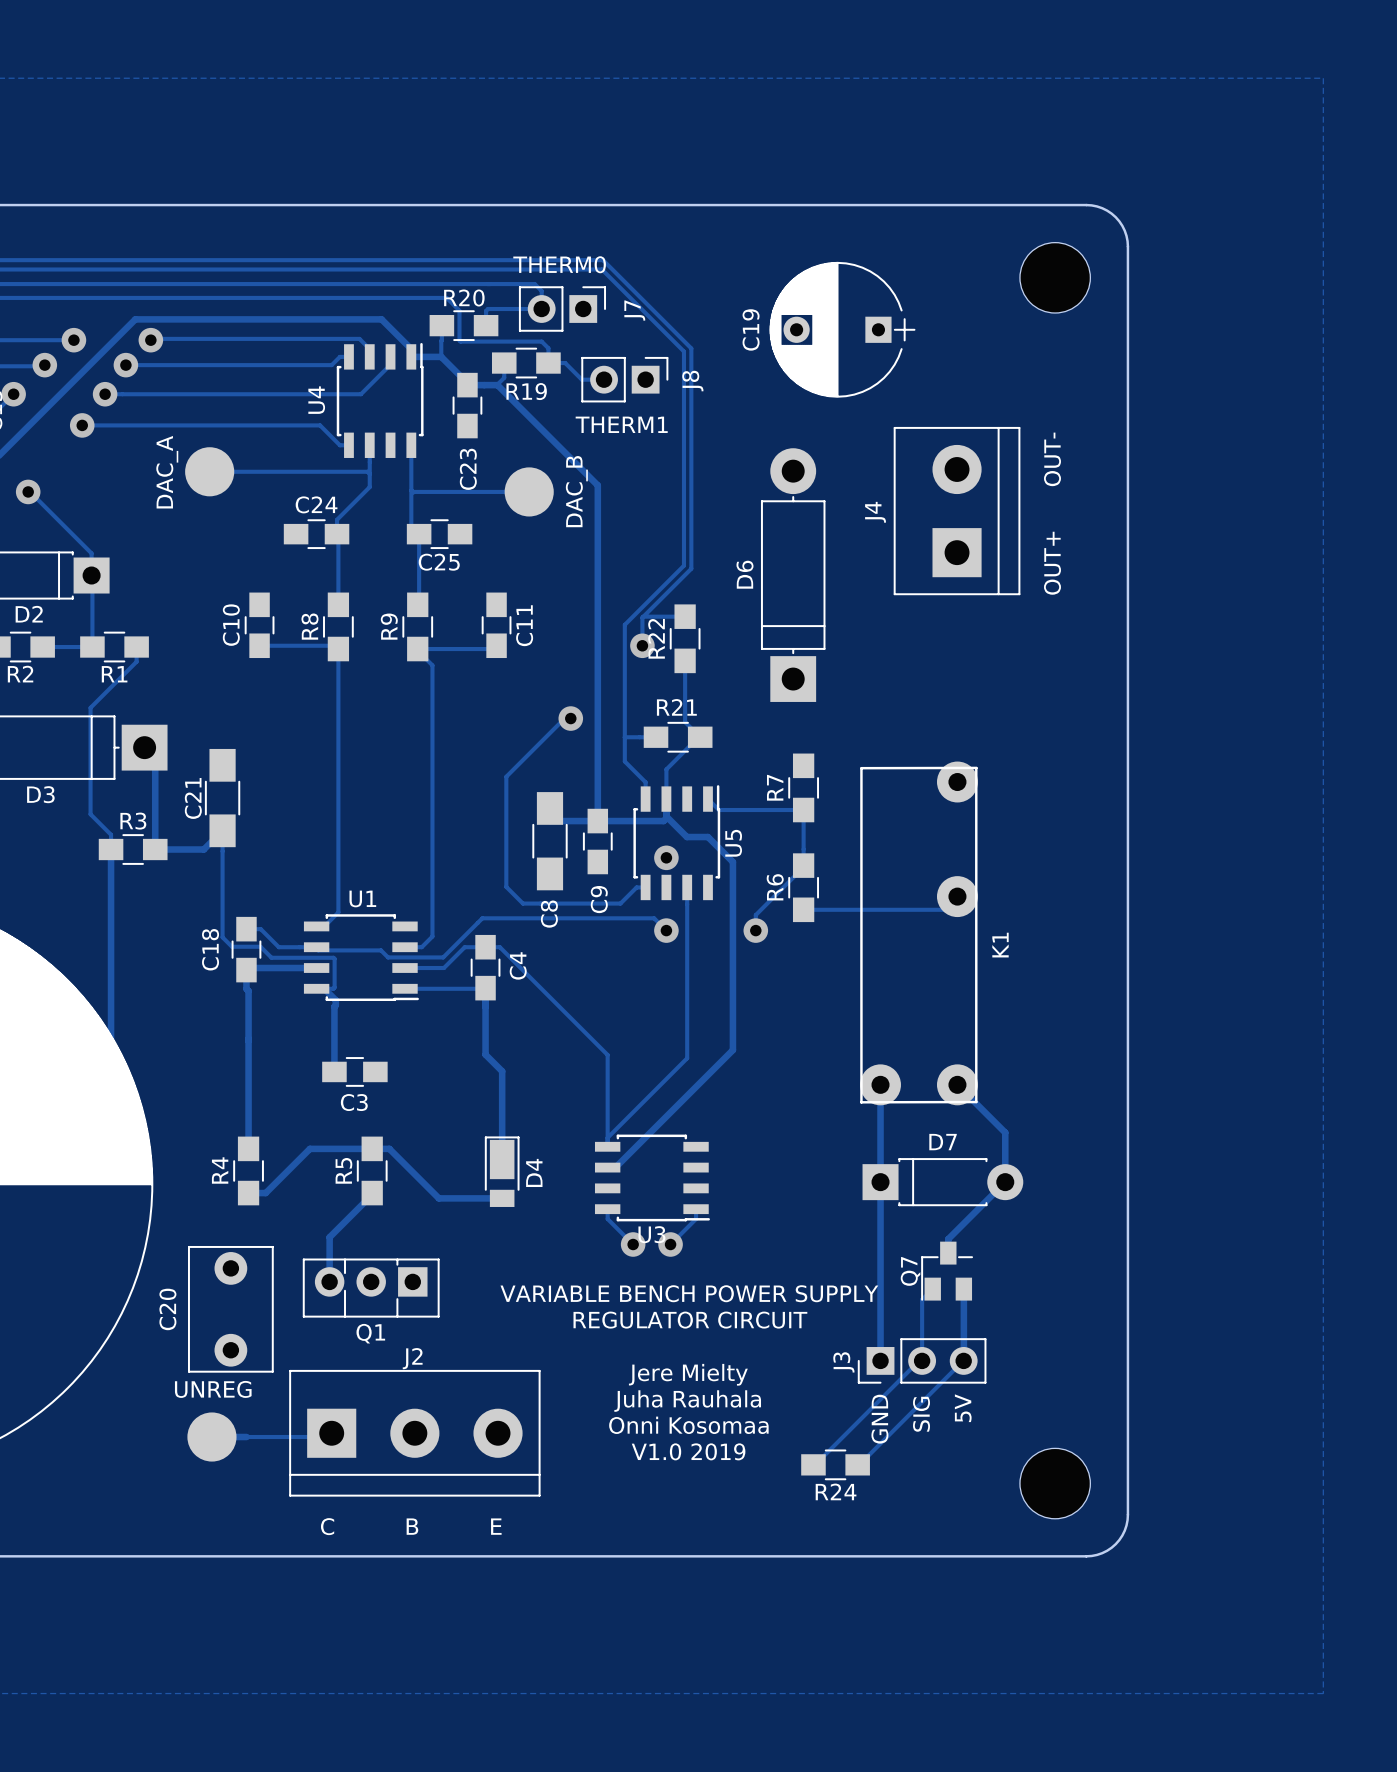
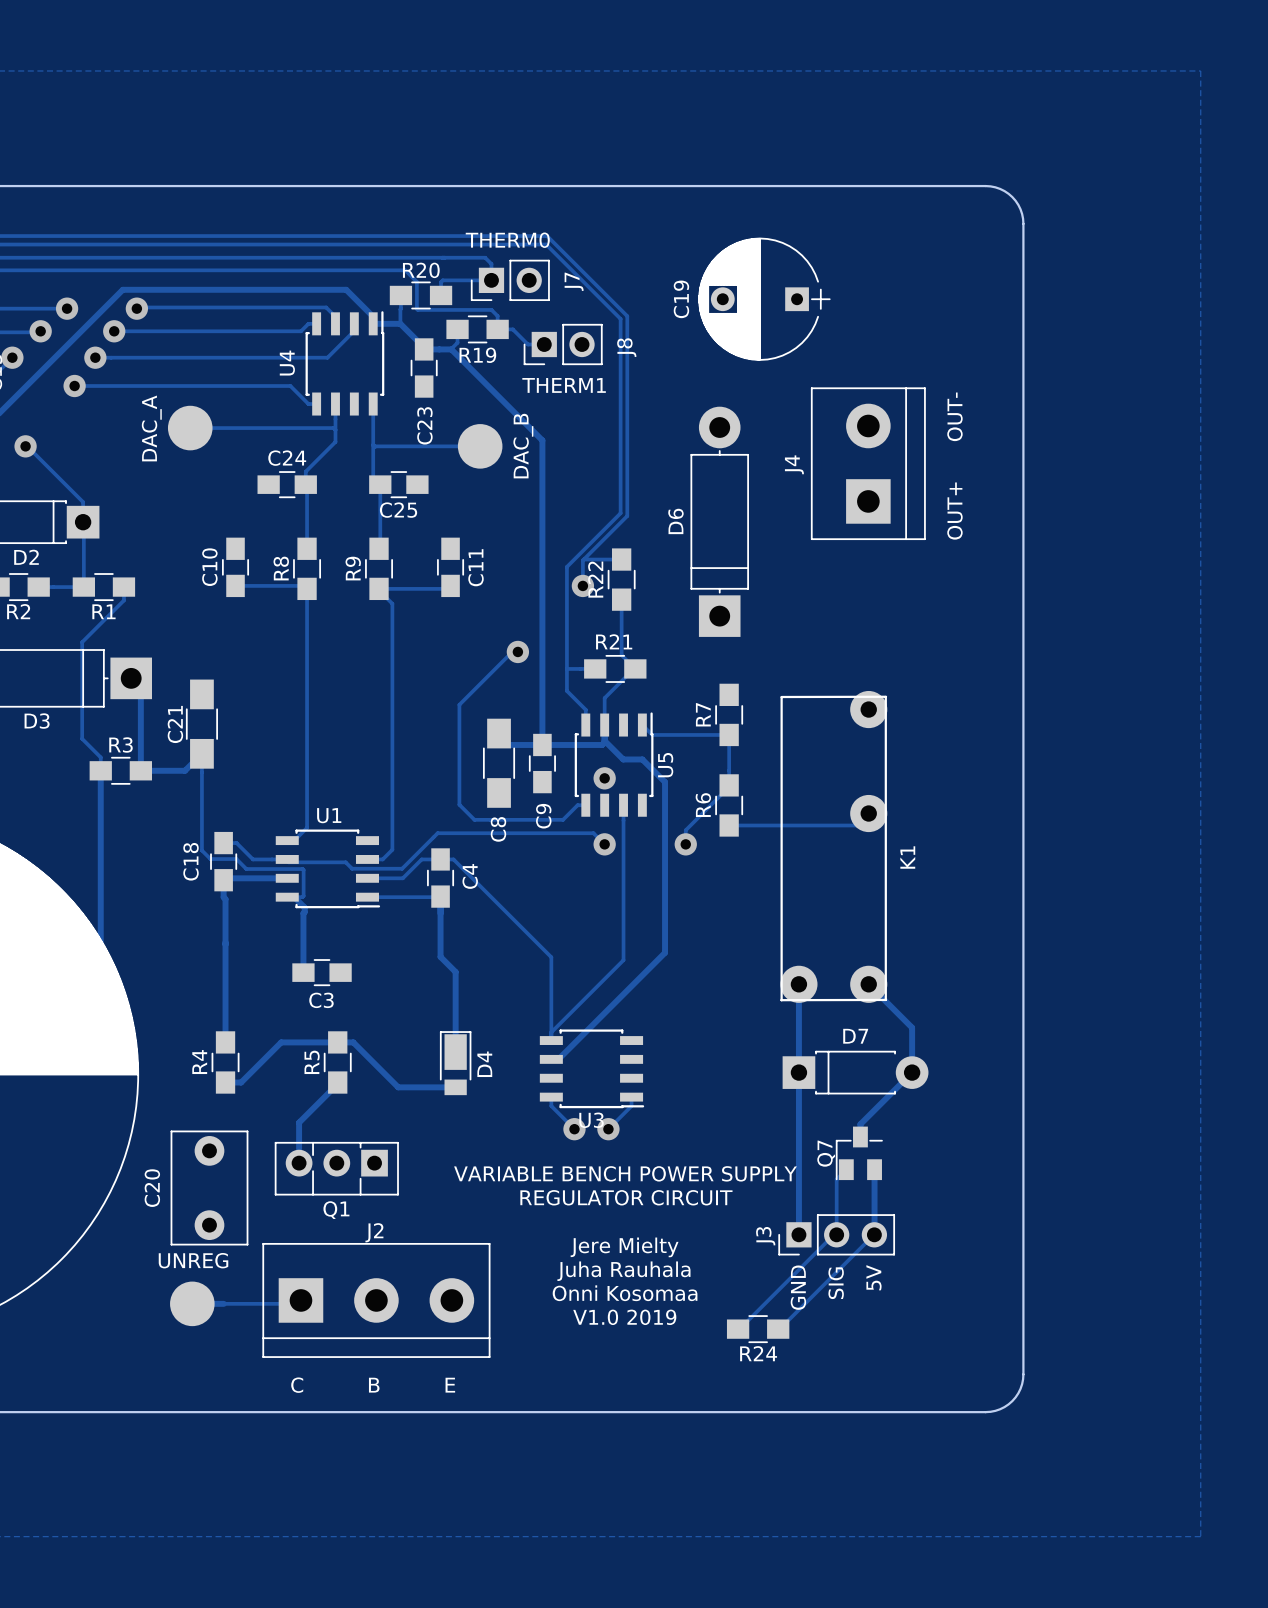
part: (1055, 277) -> none
J7 rotation: 0° (562, 309) -> 180° (510, 280)
J8 rotation: 0° (624, 379) -> 180° (563, 344)
part: (1055, 1483) -> none

